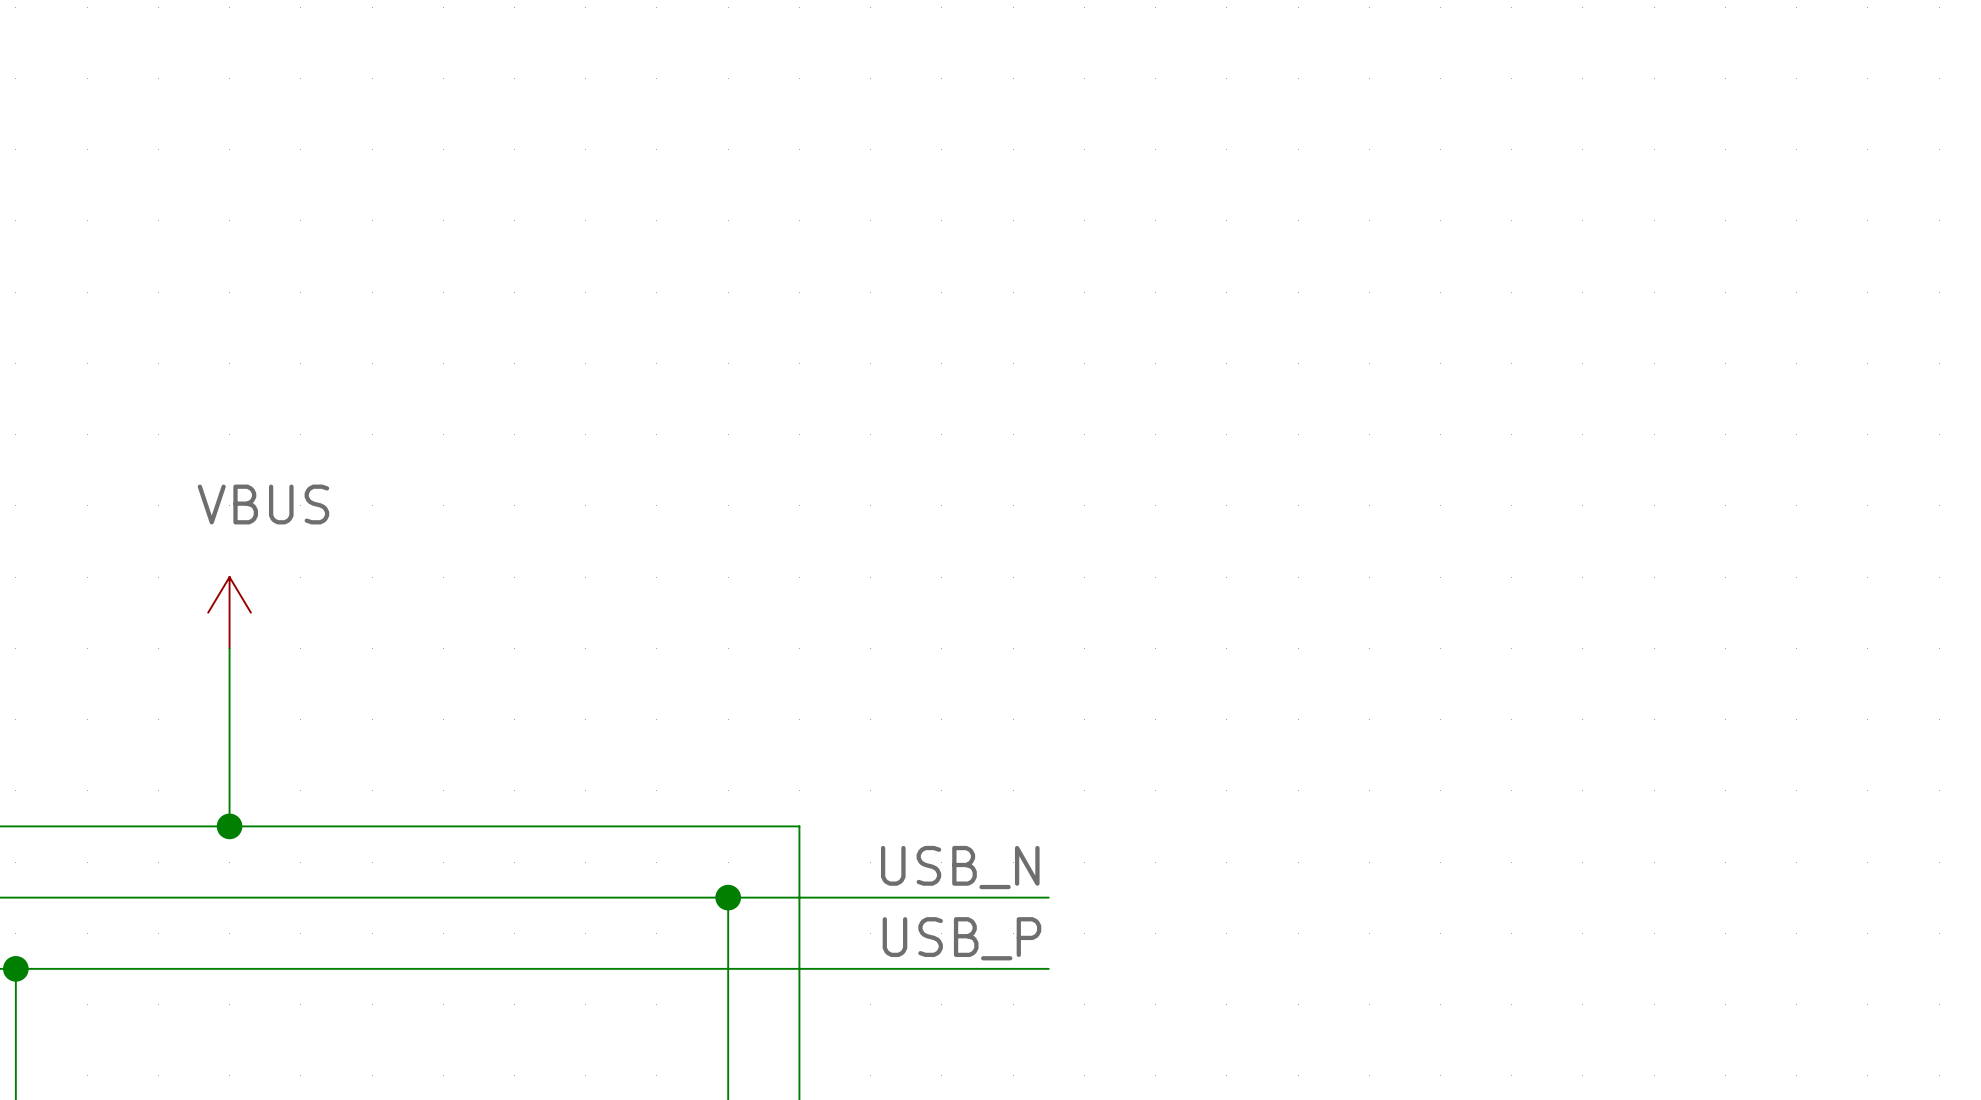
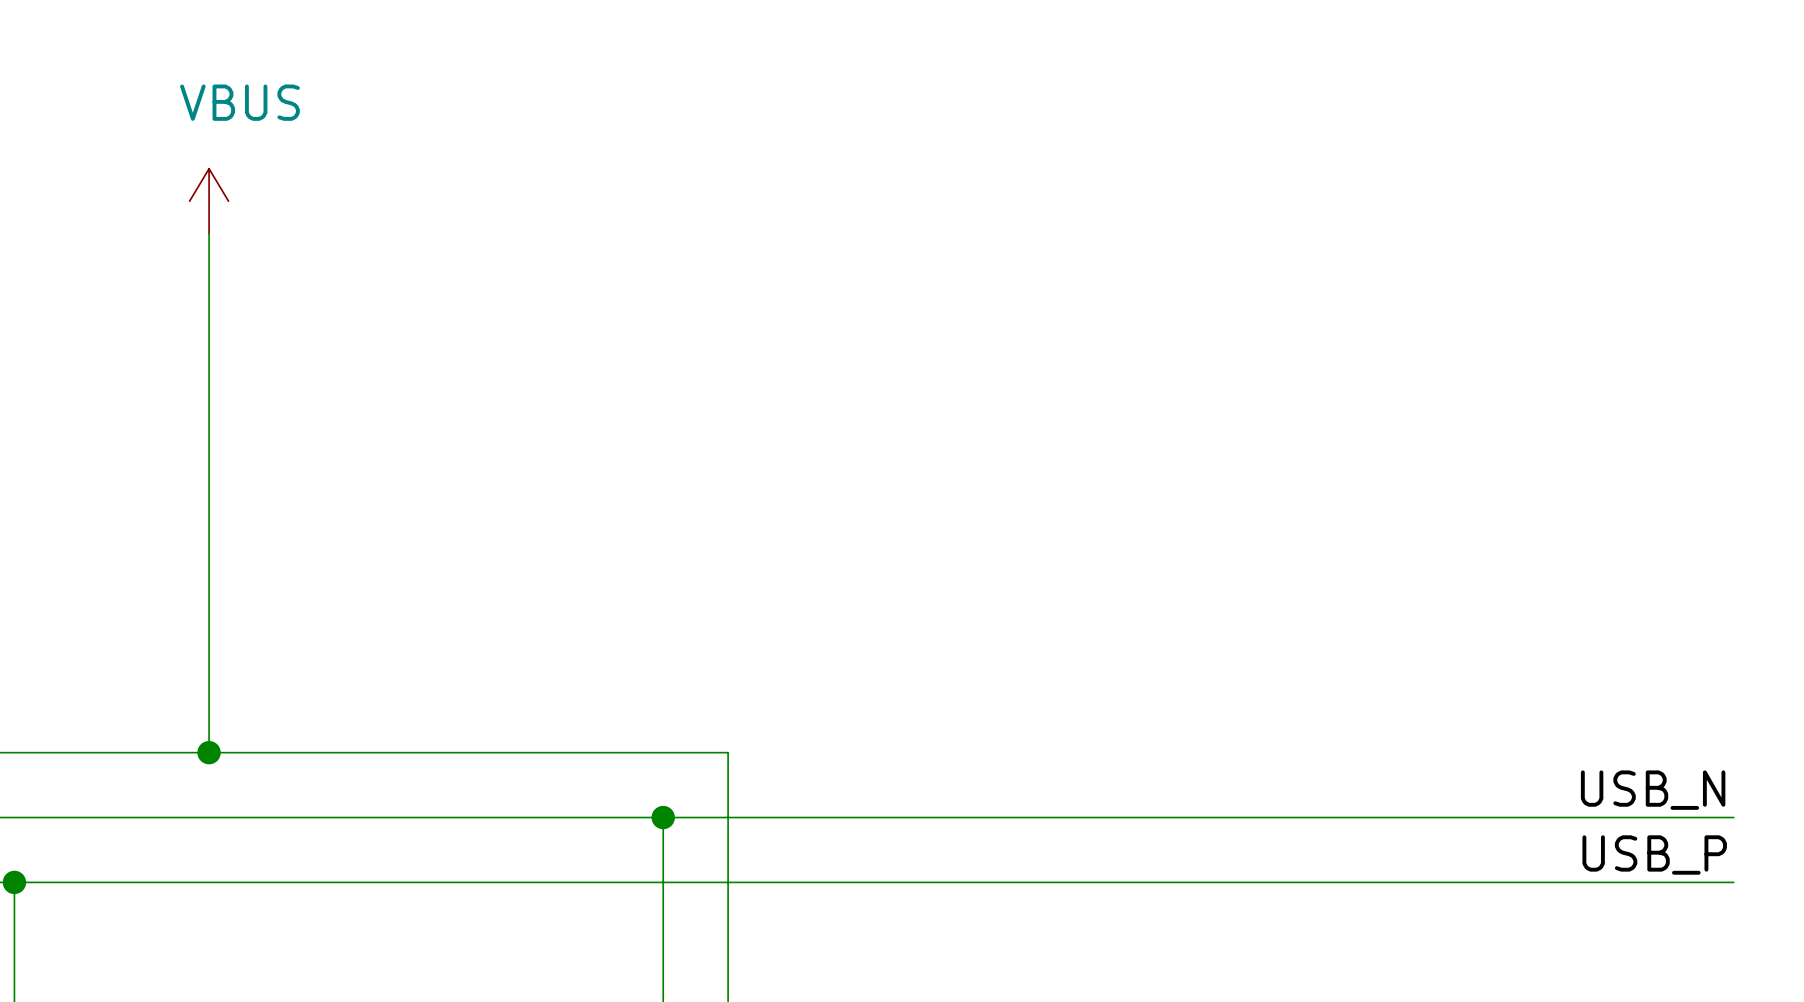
wire: none -> (209, 233) (209, 590)
power symbol position: VBUS (229, 612) -> VBUS (209, 201)
label: USB_N (960, 867) -> none
label: none -> USB_N (1653, 790)
wire: none -> (955, 817) (1733, 817)
label: USB_P (961, 938) -> none
label: none -> USB_P (1654, 855)
wire: none -> (955, 882) (1733, 882)

